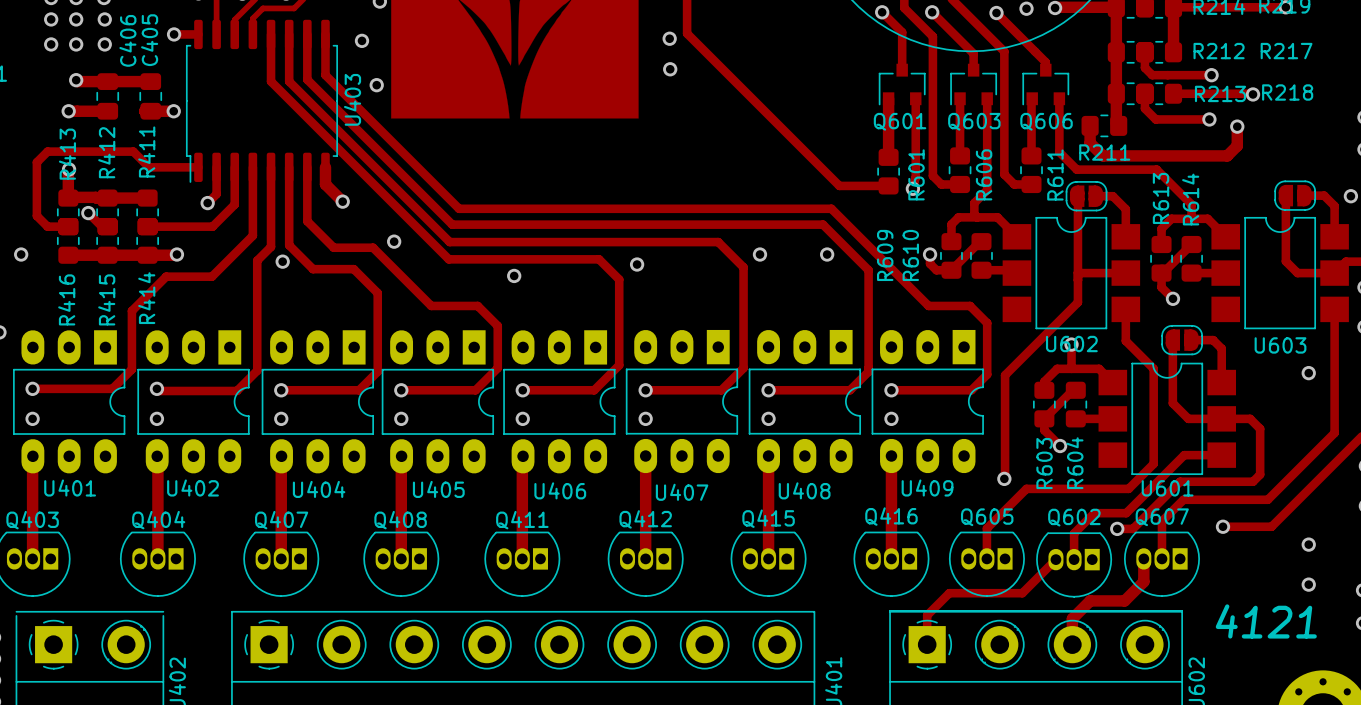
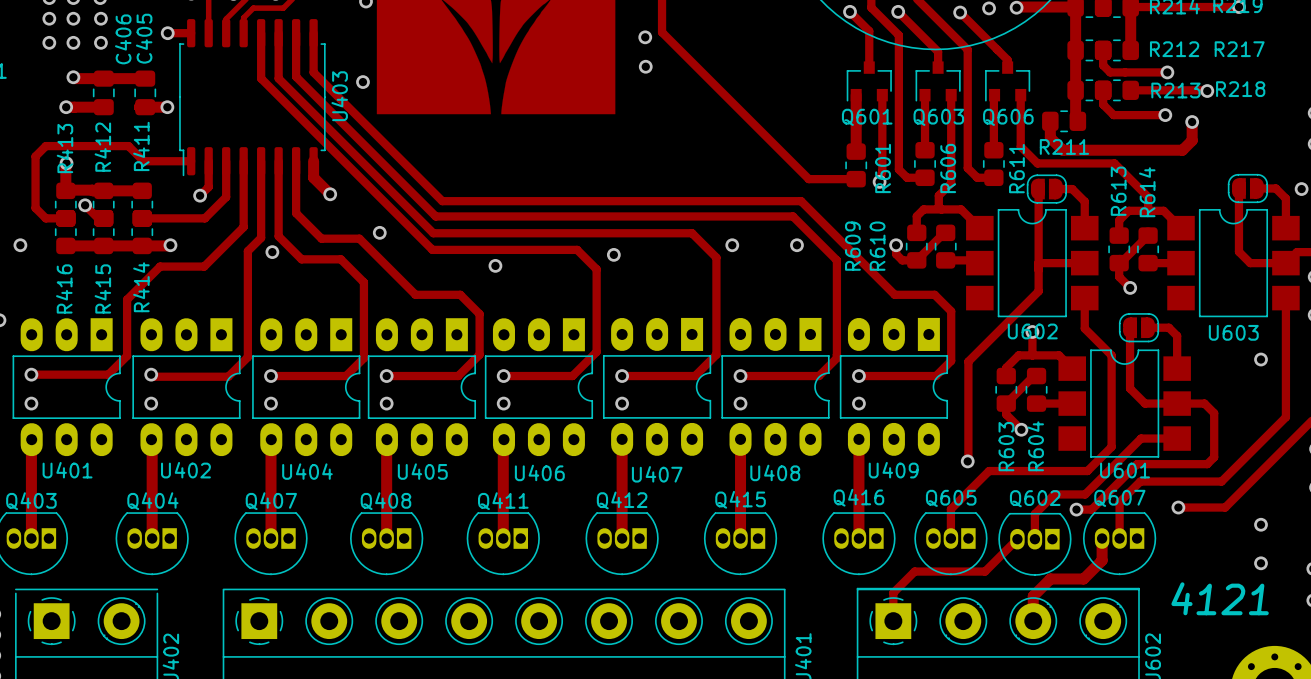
via: (362, 40) -> none

